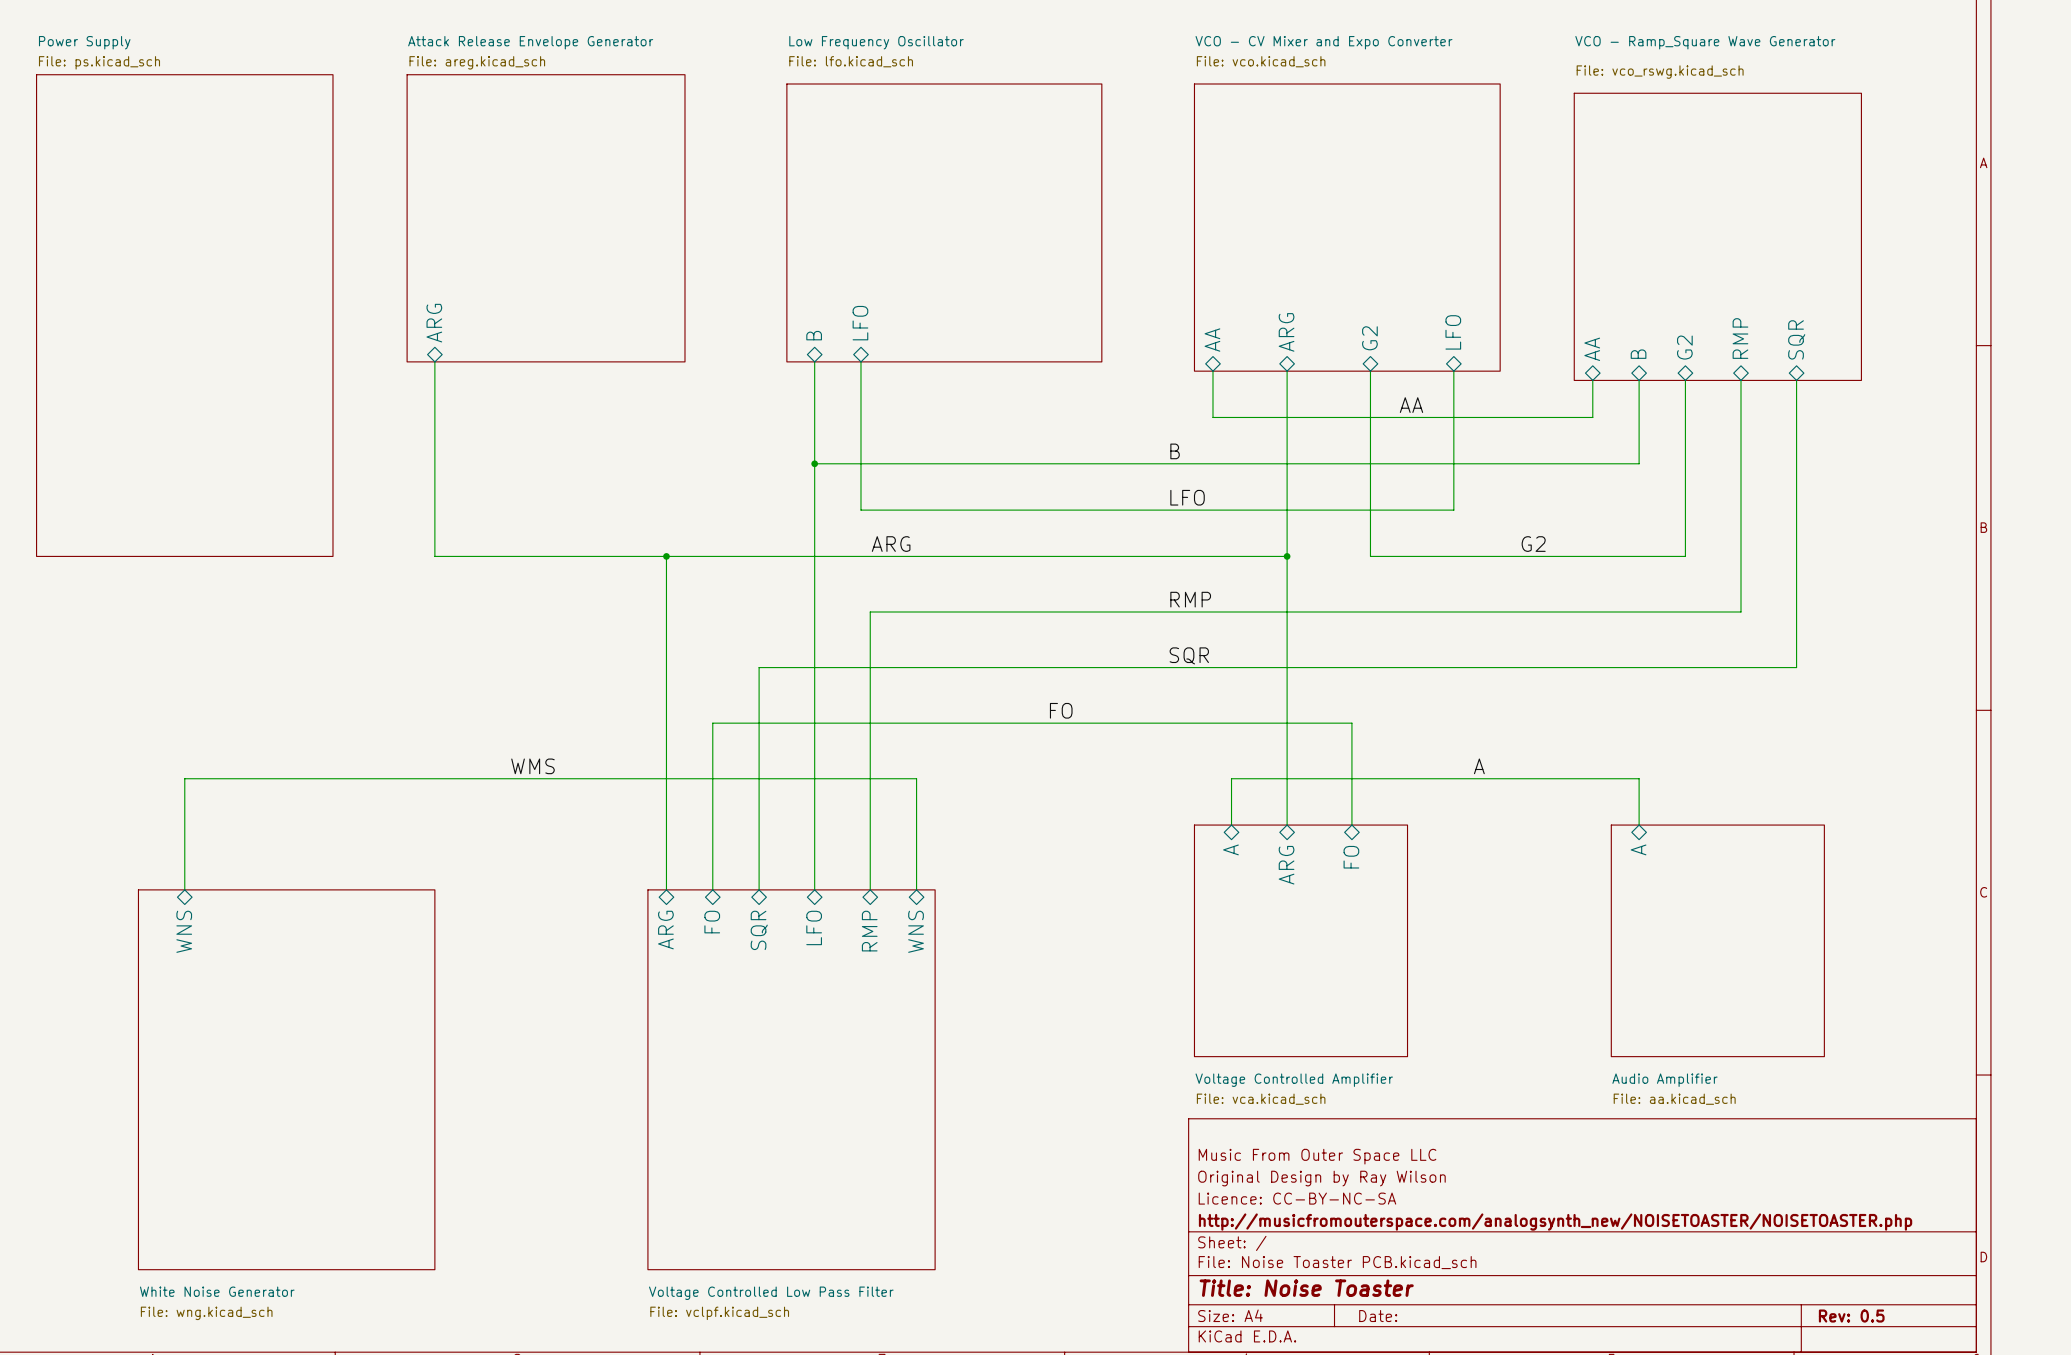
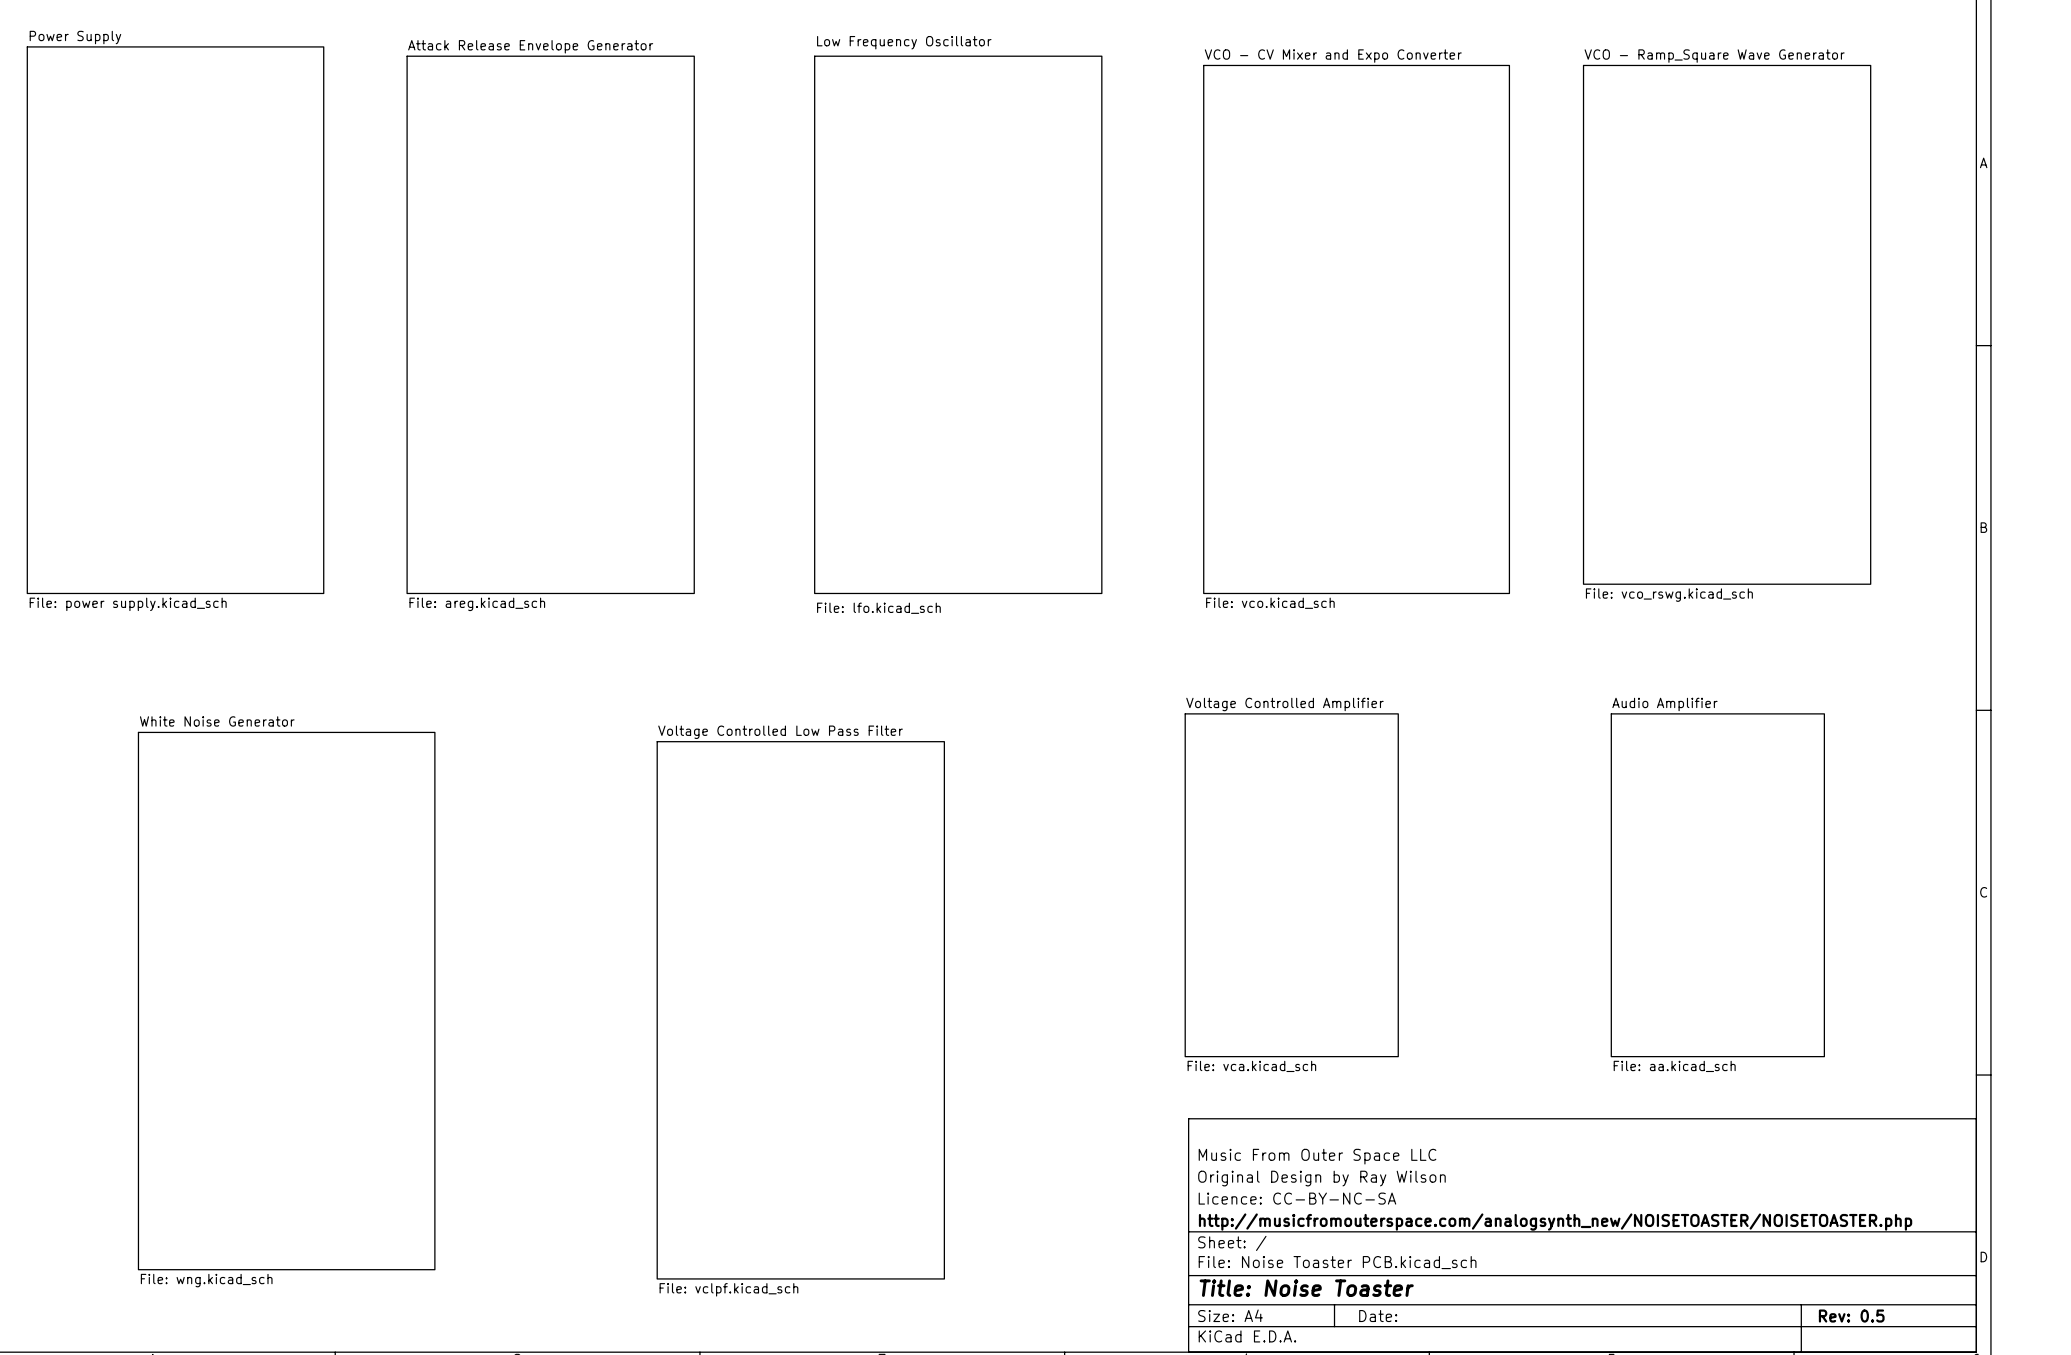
sheet Attack Release Envelope Generator: File: areg.kicad_sch (546, 218) -> none
sheet Low Frequency Oscillator: File: lfo.kicad_sch (944, 222) -> none
sheet VCO - CV Mixer and Expo Converter: File: vco.kicad_sch (1347, 227) -> none
sheet VCO - Ramp_Square Wave Generator: File: vco_rswg.kicad_sch (1717, 236) -> none
sheet Power Supply: File: ps.kicad_sch (184, 315) -> none
sheet Power Supply: none -> File: power supply.kicad_sch (175, 320)
sheet pin: ARG (434, 323) -> none
sheet pin: LFO (860, 323) -> none
sheet Attack Release Envelope Generator: none -> File: areg.kicad_sch (550, 324)
sheet Low Frequency Oscillator: none -> File: lfo.kicad_sch (958, 324)
sheet VCO - Ramp_Square Wave Generator: none -> File: vco_rswg.kicad_sch (1727, 324)
sheet VCO - CV Mixer and Expo Converter: none -> File: vco.kicad_sch (1356, 329)
sheet pin: ARG (1286, 332) -> none
sheet pin: LFO (1453, 332) -> none
sheet pin: B (814, 335) -> none
sheet pin: G2 (1369, 338) -> none
sheet pin: RMP (1740, 338) -> none
sheet pin: SQR (1796, 339) -> none
sheet pin: AA (1212, 340) -> none
sheet pin: G2 (1684, 347) -> none
sheet pin: AA (1592, 349) -> none
sheet pin: B (1638, 354) -> none
wire: (434, 361) (434, 556) (1287, 556) -> none
wire: (814, 361) (814, 889) -> none
wire: (860, 361) (860, 510) (1453, 510) (1453, 371) -> none
wire: (1212, 371) (1212, 417) (1592, 417) (1592, 380) -> none
wire: (1287, 371) (1287, 825) -> none
wire: (1370, 371) (1370, 556) (1685, 556) (1685, 380) -> none
wire: (1639, 380) (1639, 463) (814, 463) -> none
wire: (1741, 380) (1741, 612) (870, 612) (870, 889) -> none
wire: (1796, 380) (1796, 667) (759, 667) (759, 889) -> none
label: AA (1411, 405) -> none
label: B (1175, 451) -> none
junction: (814, 463) -> none
label: LFO (1187, 497) -> none
label: ARG (891, 544) -> none
label: G2 (1533, 544) -> none
wire: (666, 556) (666, 889) -> none
junction: (666, 556) -> none
junction: (1287, 556) -> none
label: RMP (1190, 599) -> none
label: SQR (1189, 655) -> none
label: FO (1061, 710) -> none
label: WMS (532, 766) -> none
label: A (1479, 766) -> none
wire: (1231, 825) (1231, 778) (1639, 778) (1639, 825) -> none
wire: (1351, 825) (1351, 723) (712, 723) (712, 889) -> none
sheet pin: A (1230, 849) -> none
sheet pin: A (1638, 849) -> none
sheet pin: FO (1351, 857) -> none
sheet pin: ARG (1286, 865) -> none
sheet Voltage Controlled Amplifier: none -> File: vca.kicad_sch (1291, 885)
sheet Audio Amplifier: none -> File: aa.kicad_sch (1717, 885)
wire: (184, 889) (184, 778) (916, 778) (916, 889) -> none
sheet pin: FO (712, 922) -> none
sheet pin: LFO (814, 927) -> none
sheet pin: ARG (665, 930) -> none
sheet pin: SQR (759, 930) -> none
sheet pin: WNS (184, 931) -> none
sheet pin: RMP (869, 931) -> none
sheet pin: WNS (916, 931) -> none
sheet Voltage Controlled Amplifier: File: vca.kicad_sch (1300, 940) -> none
sheet Audio Amplifier: File: aa.kicad_sch (1717, 940) -> none
sheet White Noise Generator: none -> File: wng.kicad_sch (286, 1001)
sheet Voltage Controlled Low Pass Filter: none -> File: vclpf.kicad_sch (800, 1010)
sheet White Noise Generator: File: wng.kicad_sch (286, 1079) -> none
sheet Voltage Controlled Low Pass Filter: File: vclpf.kicad_sch (791, 1079) -> none

